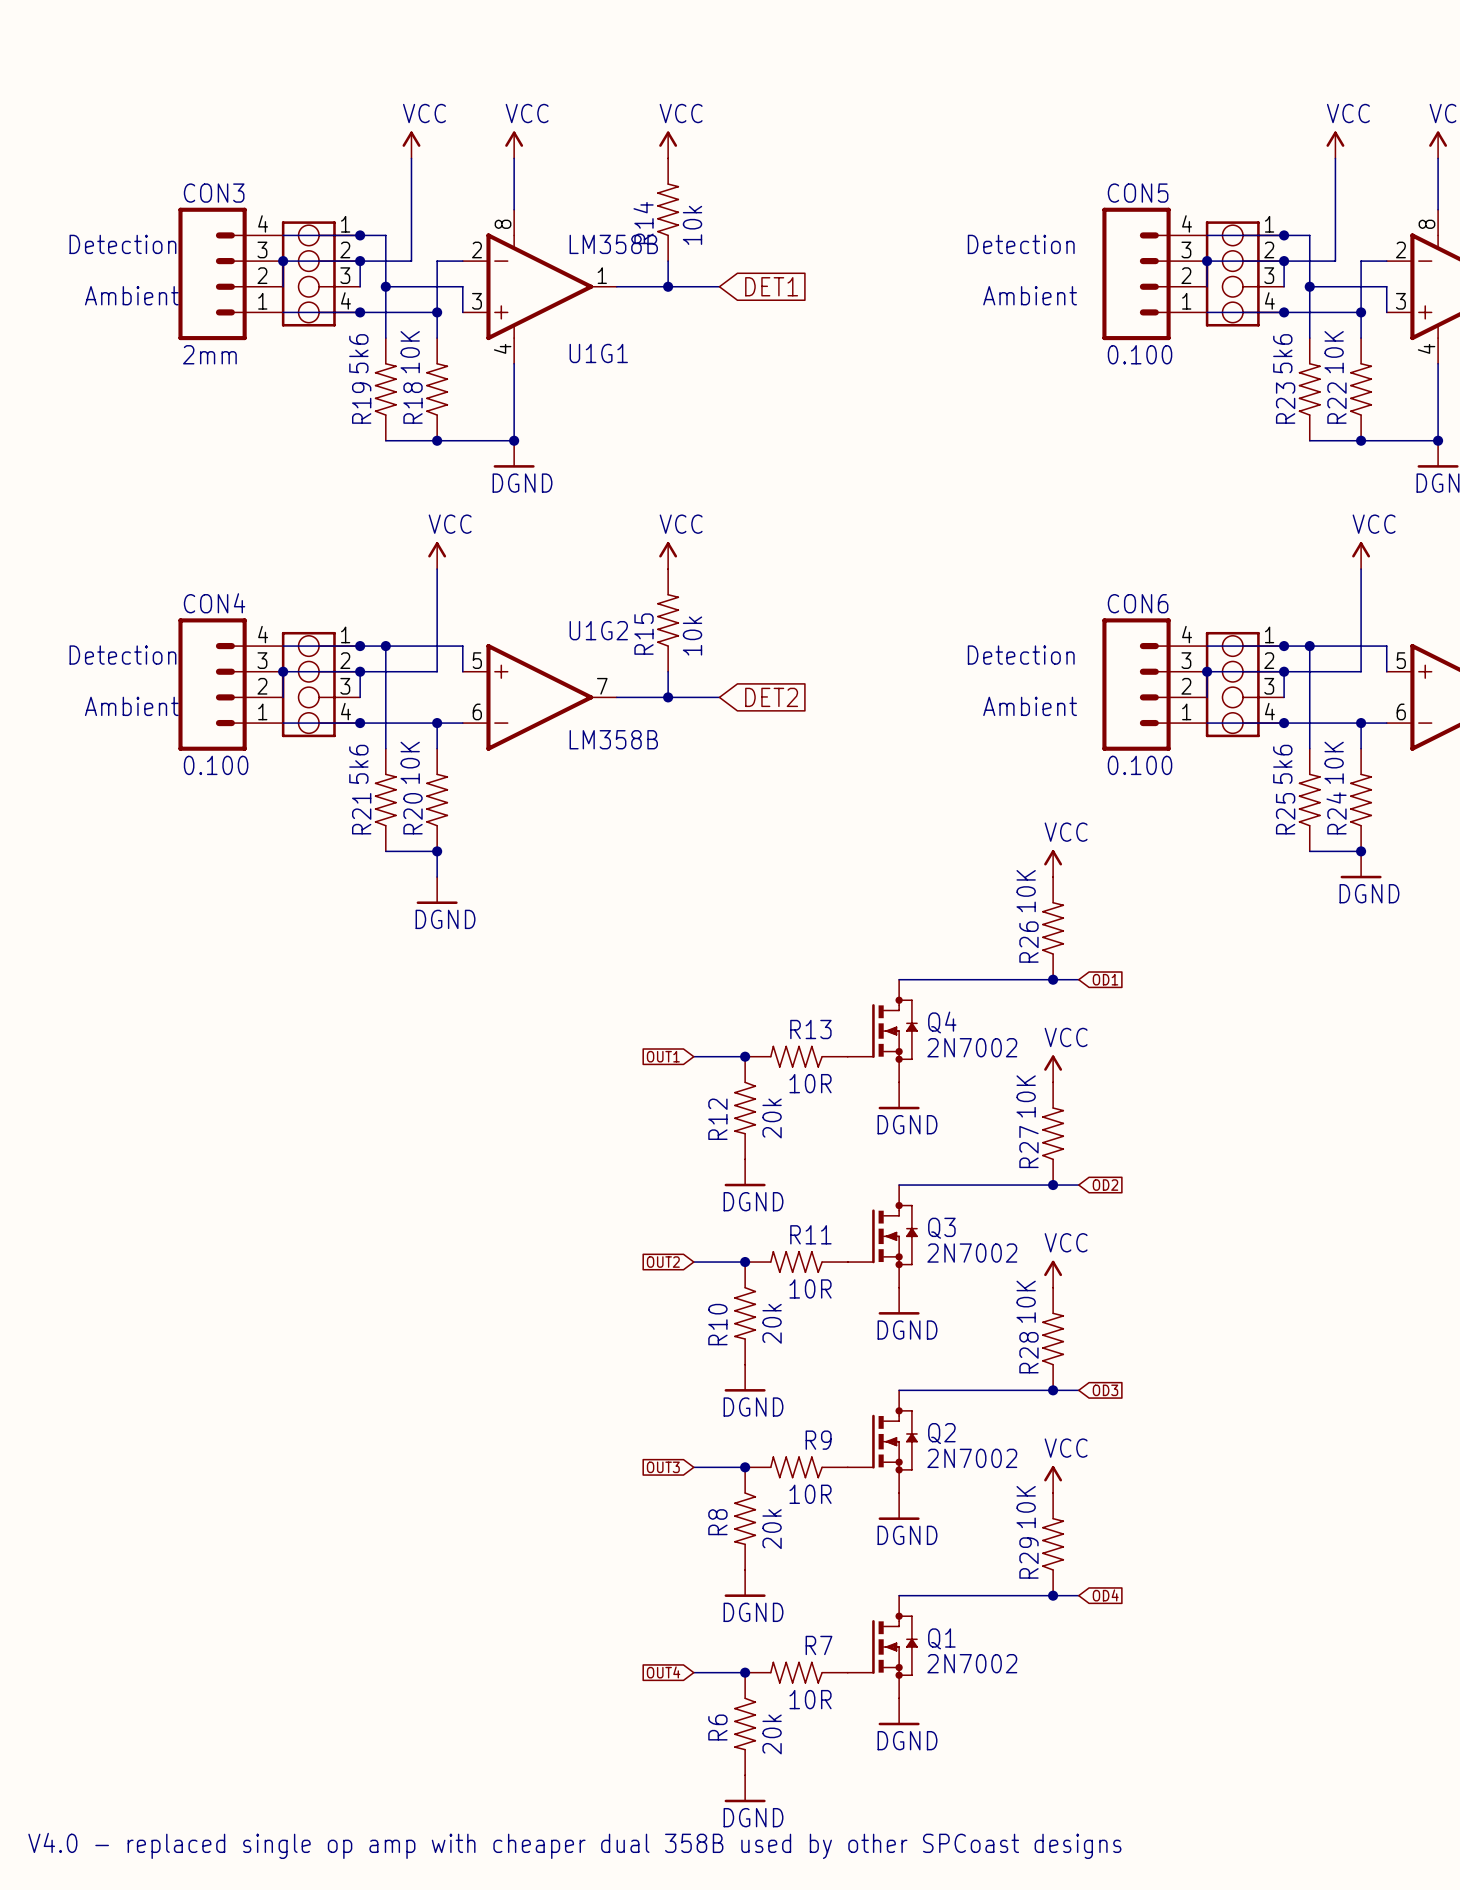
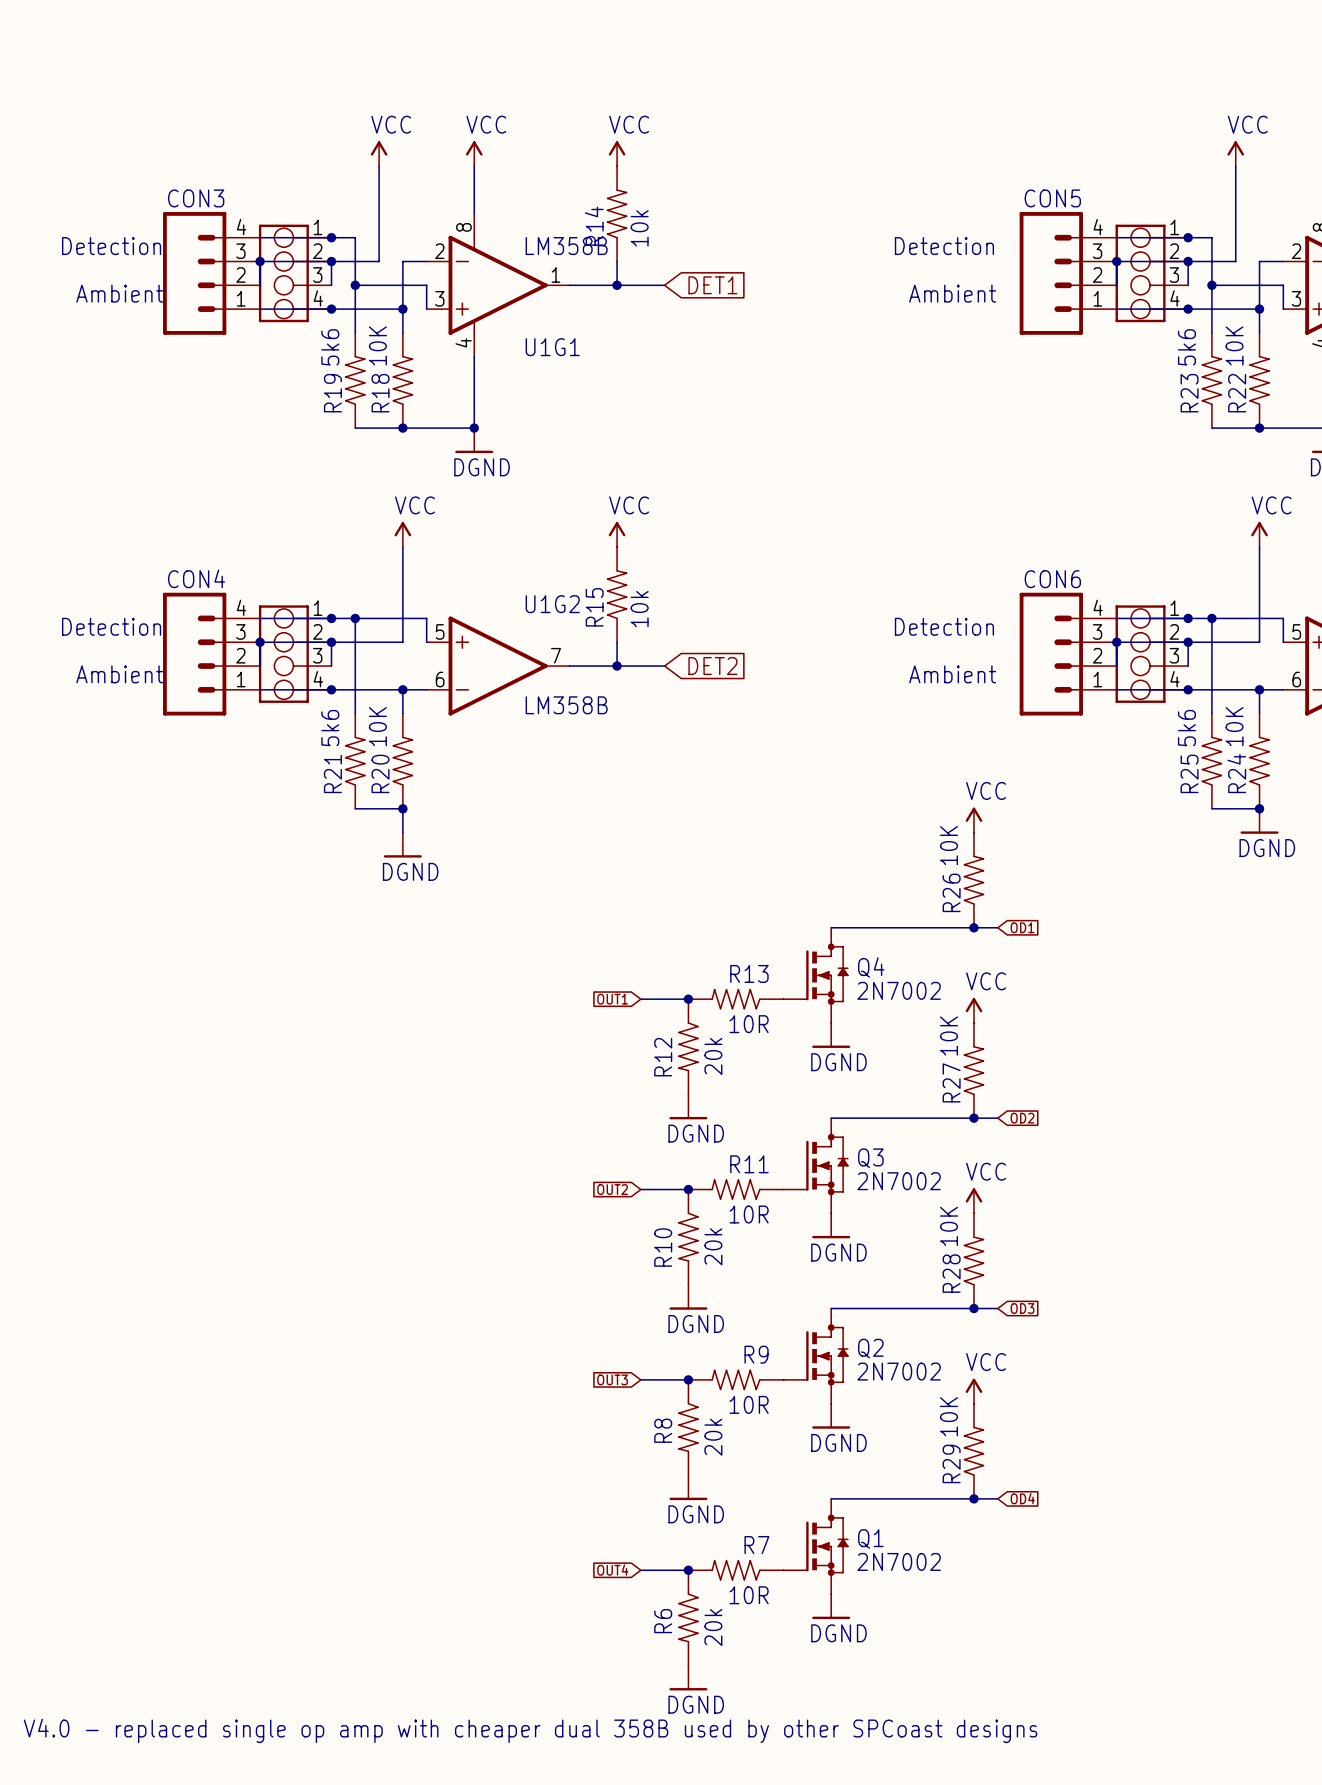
CON3 value: 2mm (209, 354) -> none
CON5 value: 0.100 (1140, 354) -> none
CON4 value: 0.100 (216, 765) -> none
CON6 value: 0.100 (1140, 765) -> none

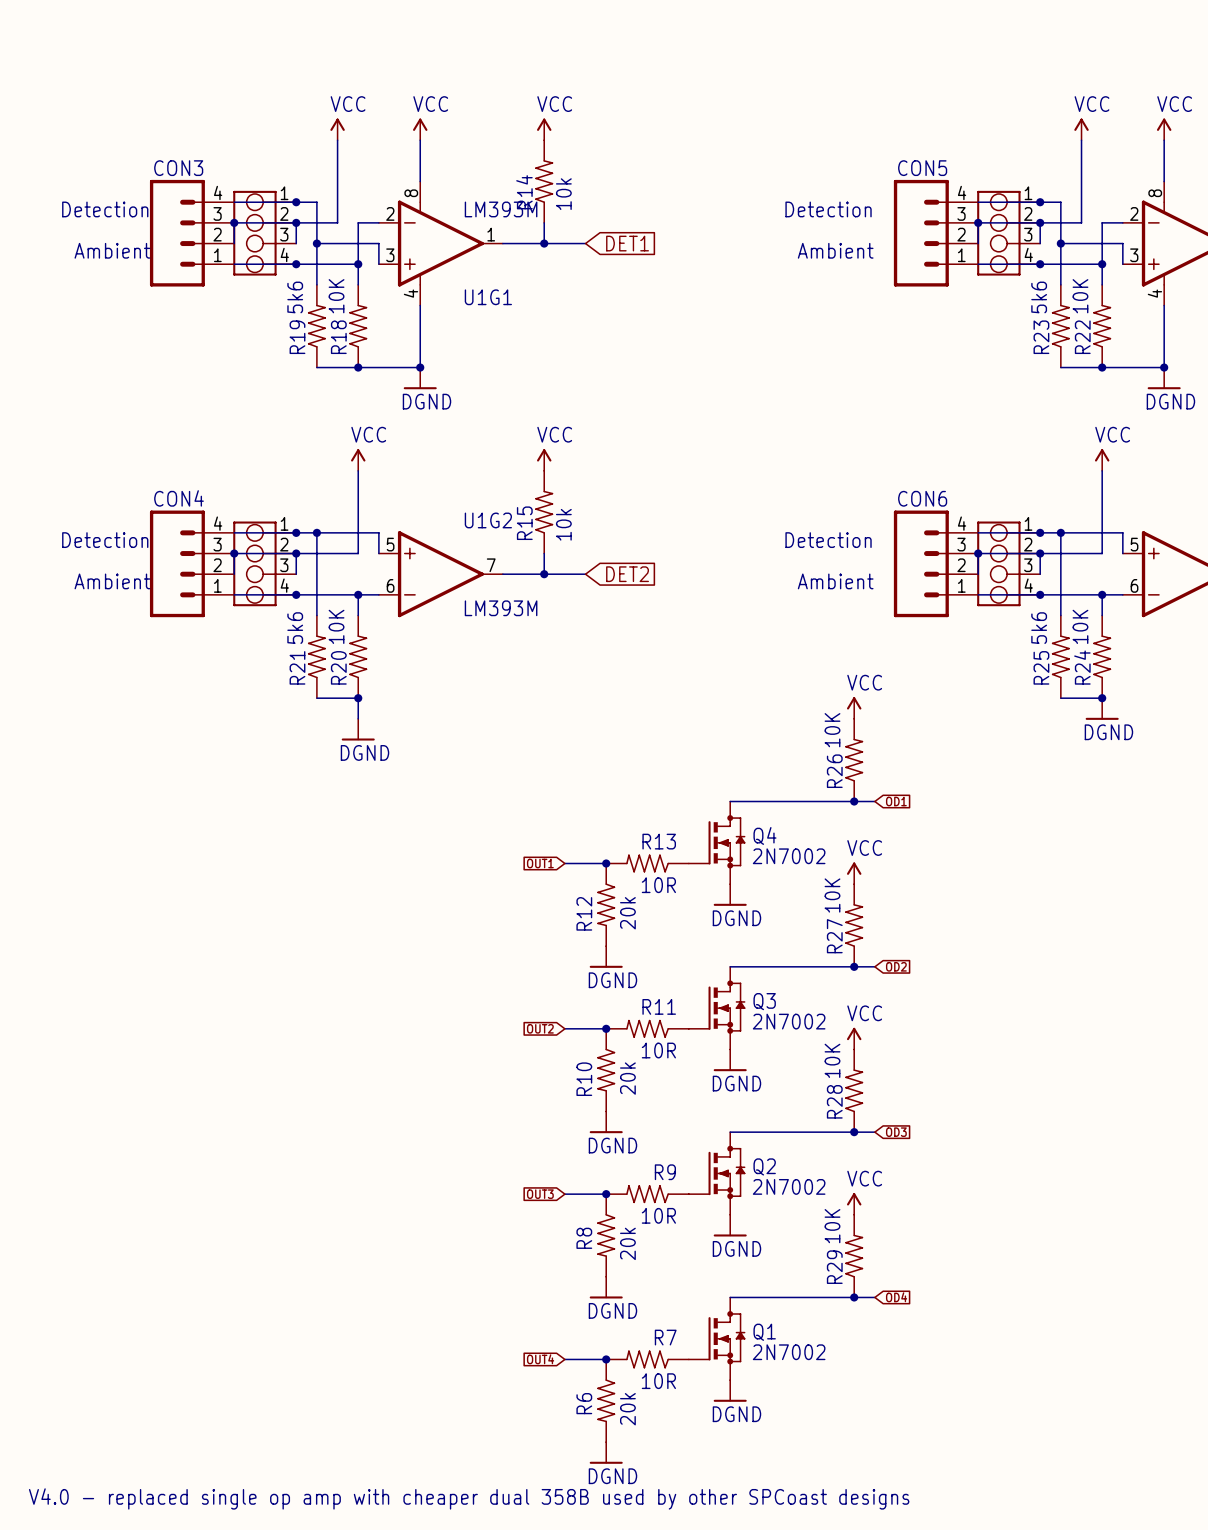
U1G1 value: LM358B (566, 246) -> LM393M (501, 209)
U1G2 value: LM358B (566, 705) -> LM393M (501, 608)

